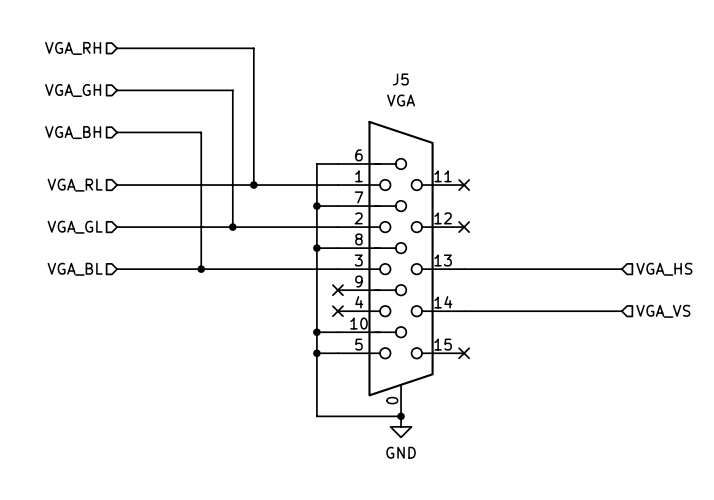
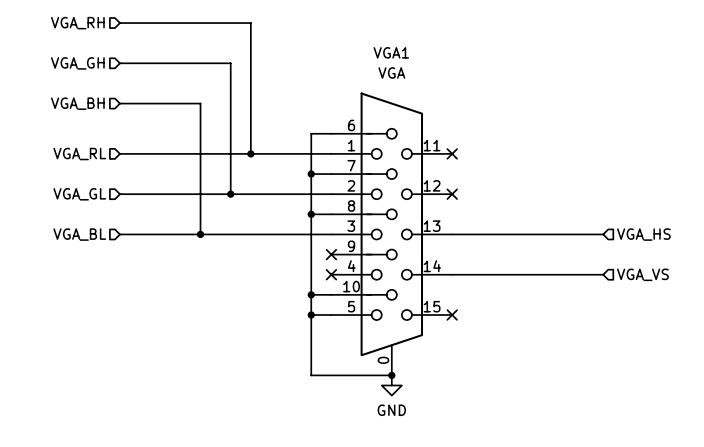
J5 name: J5 (400, 79) -> VGA1 (391, 52)

